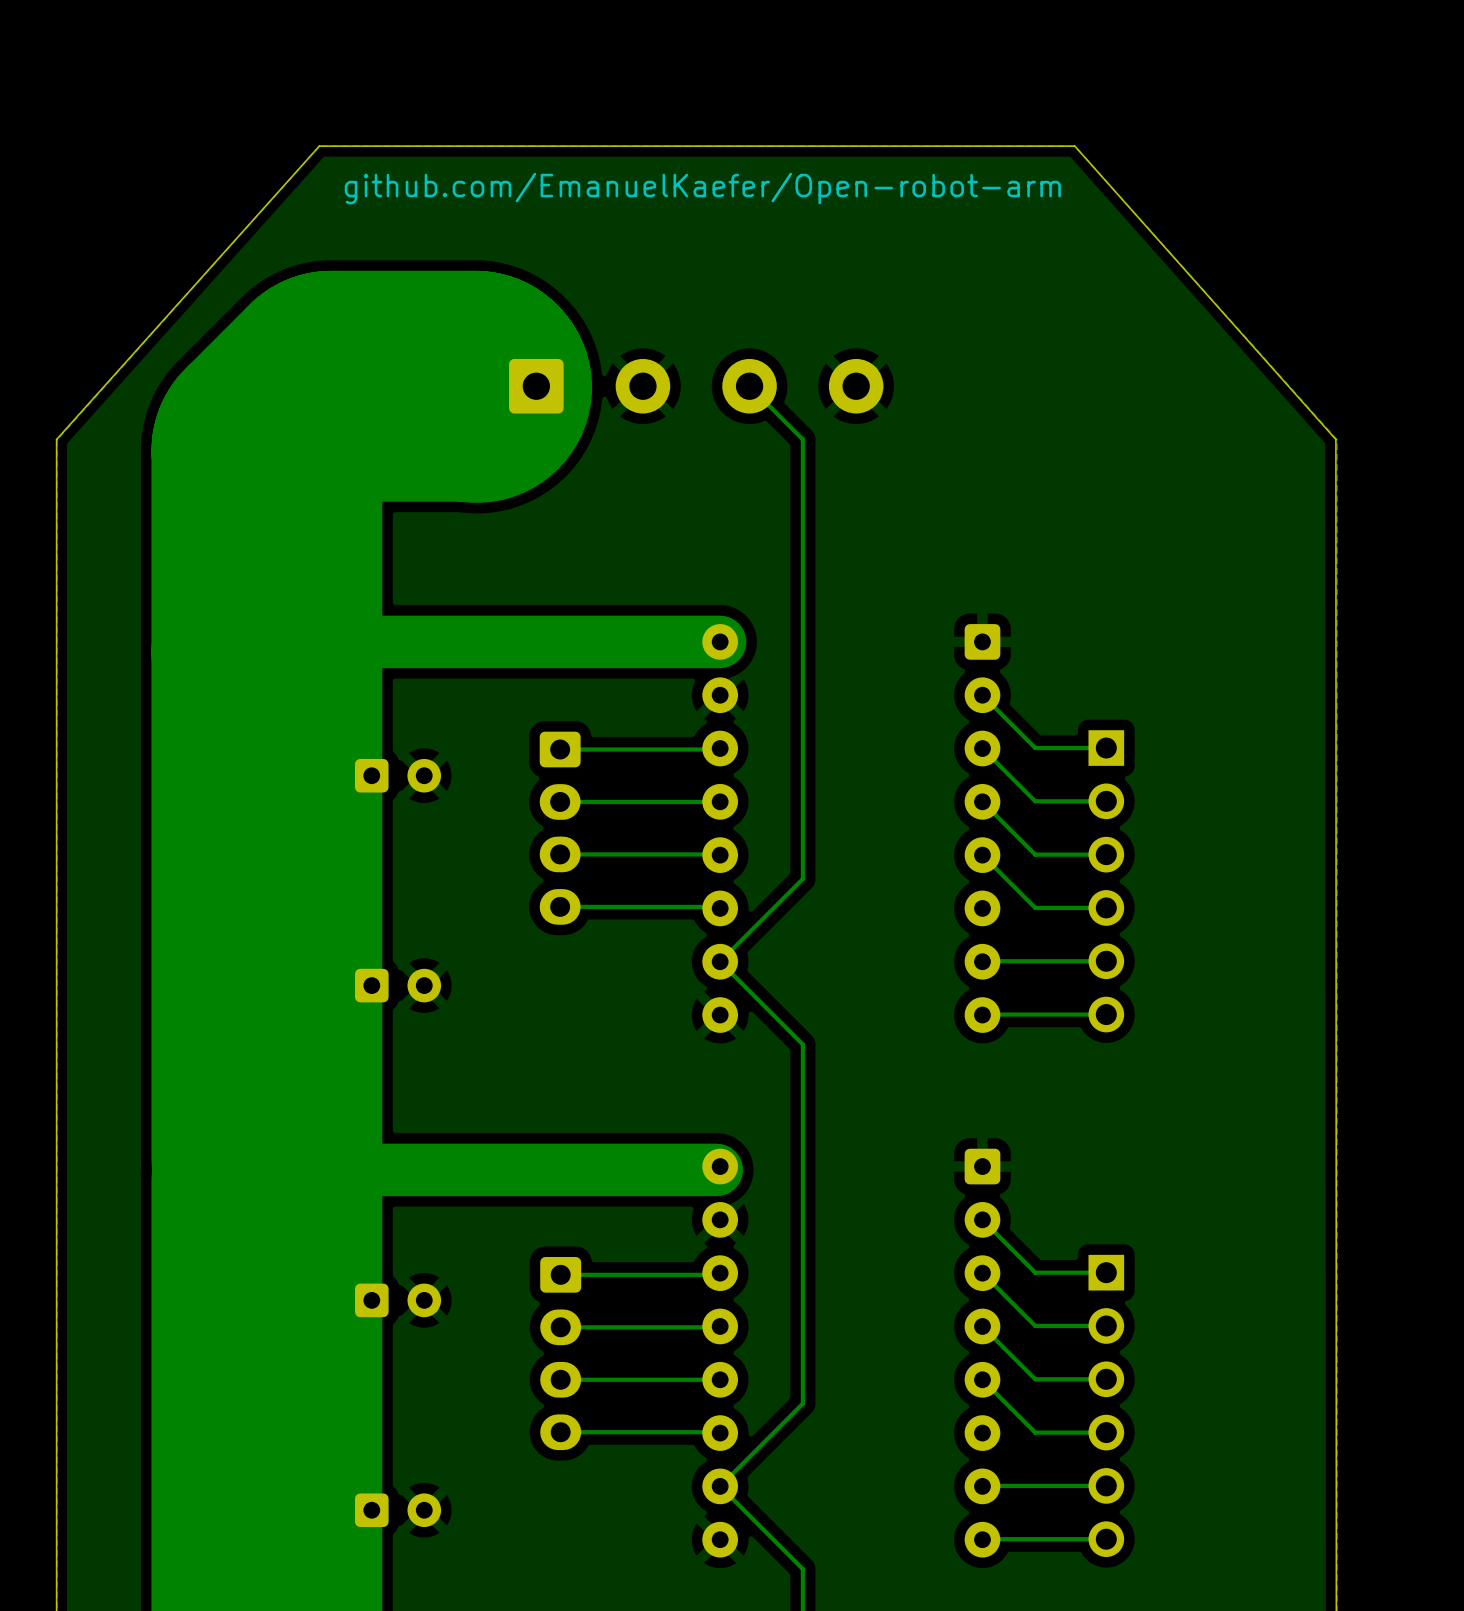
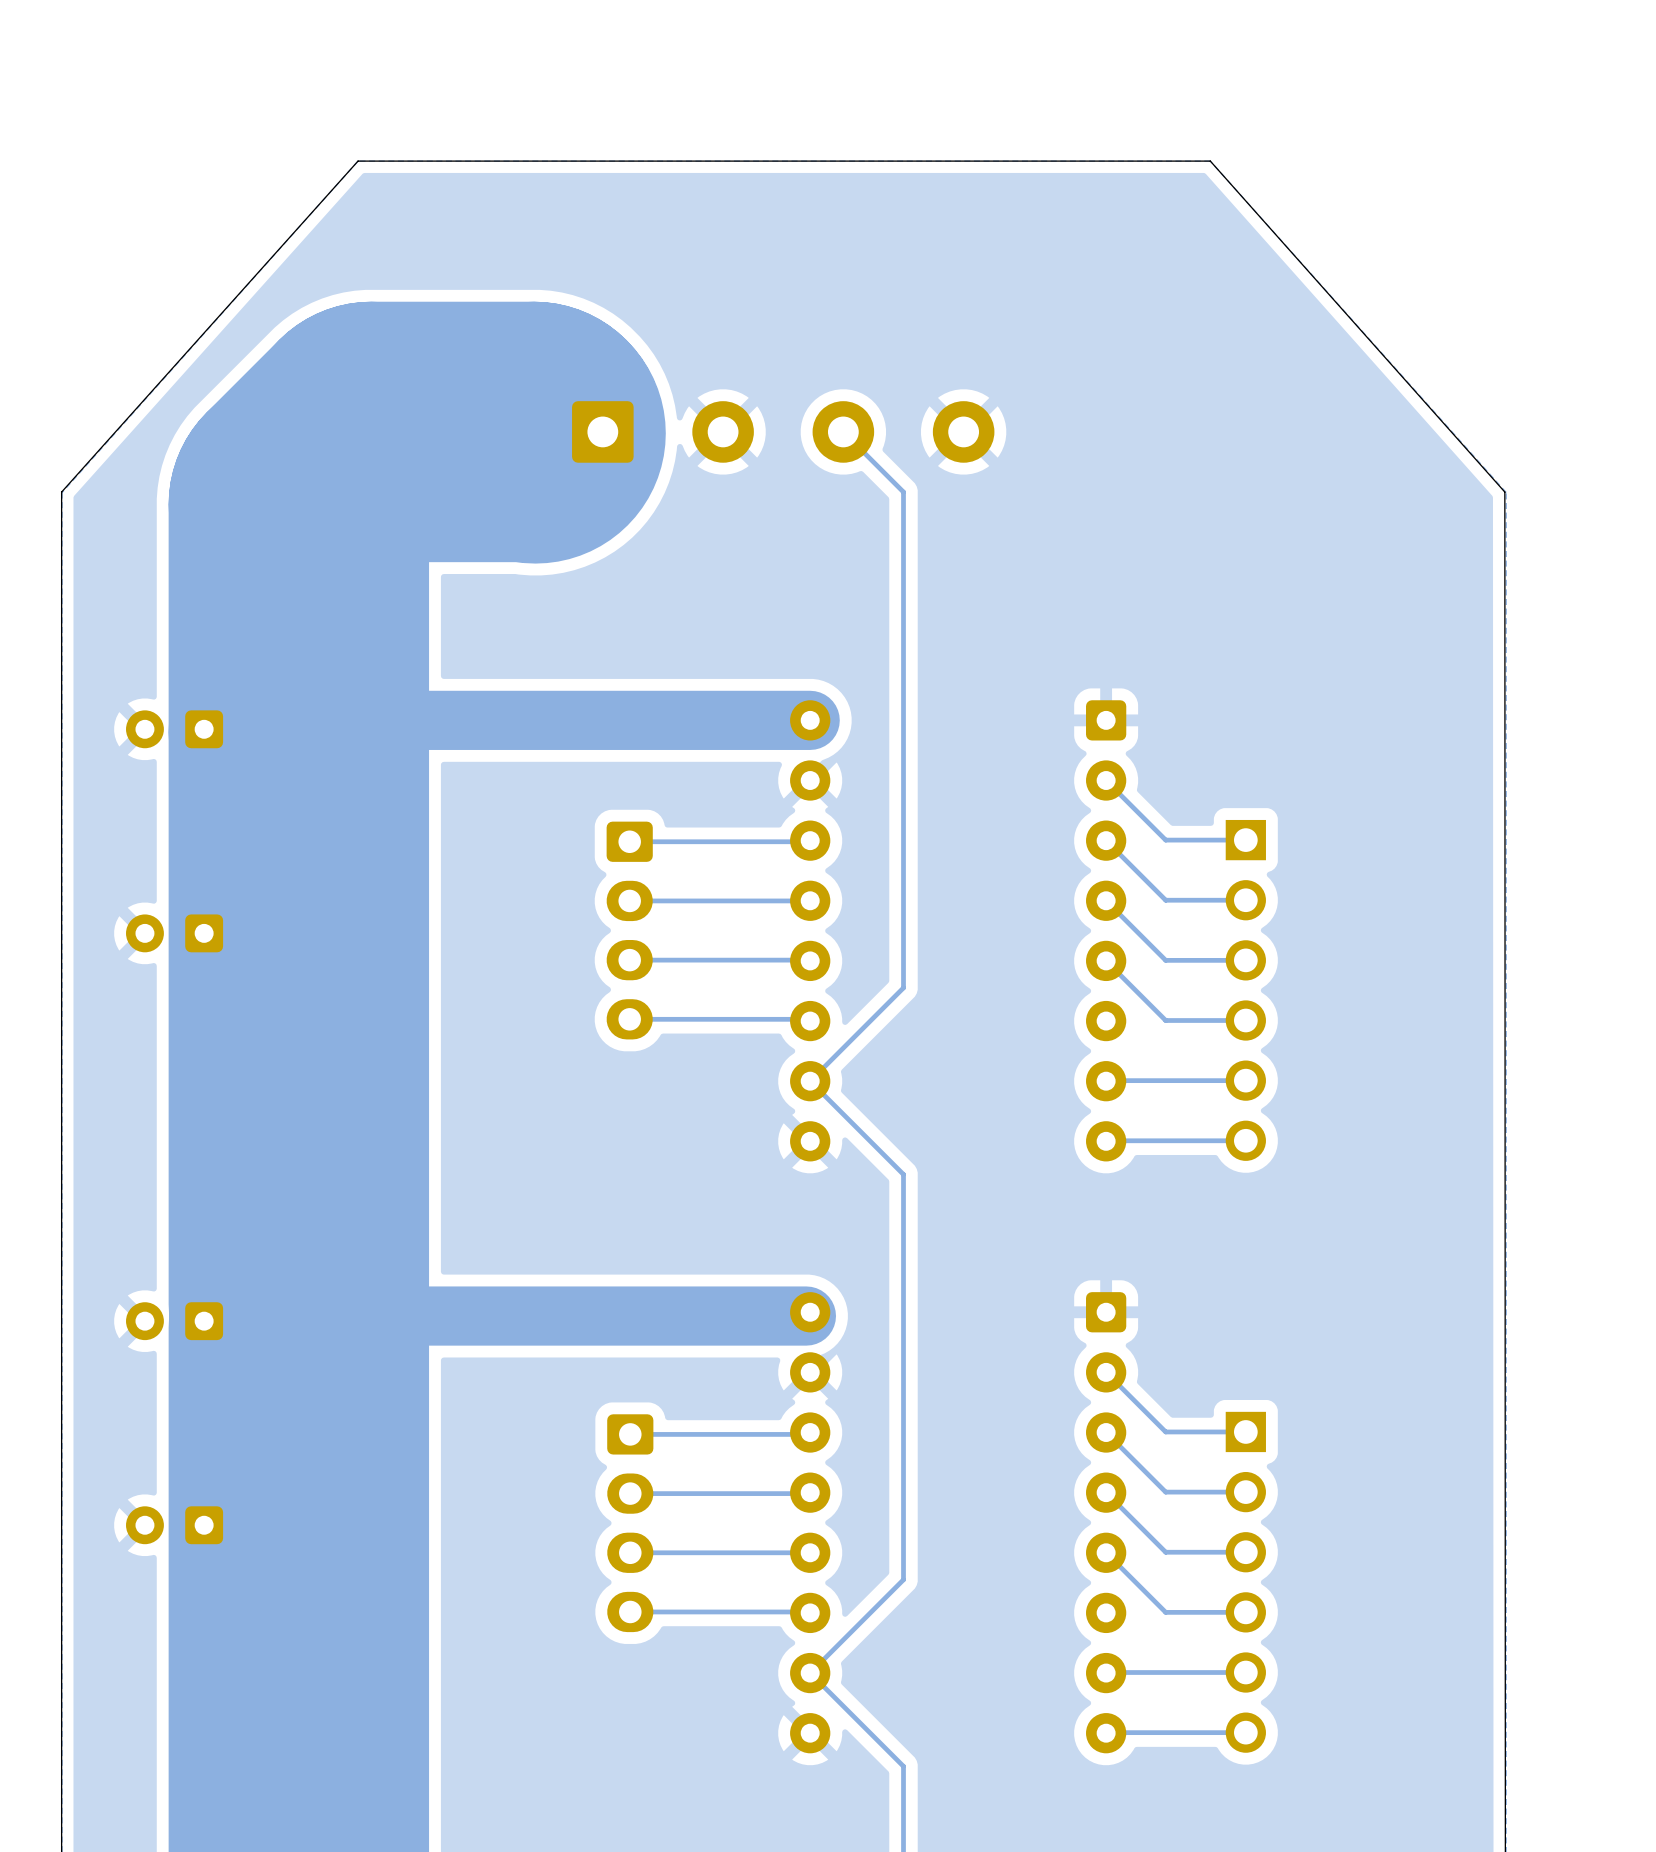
text: github.com/EmanuelKaefer/Open-robot-arm (702, 188) -> none
part: none -> (174, 729)
part: (397, 775) -> none
part: none -> (174, 933)
part: (398, 985) -> none
part: none -> (174, 1321)
part: (398, 1300) -> none
part: none -> (174, 1525)
part: (398, 1510) -> none

